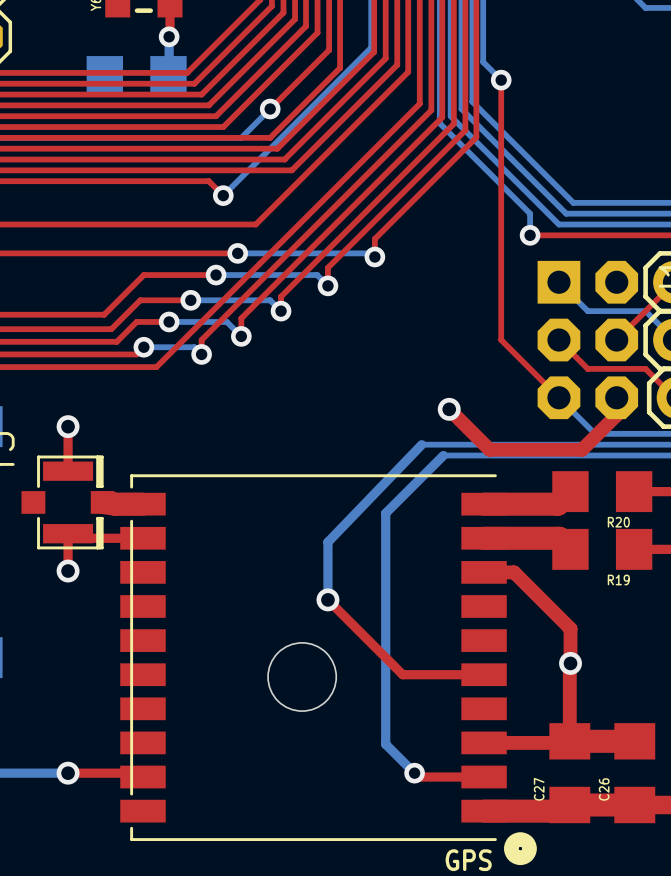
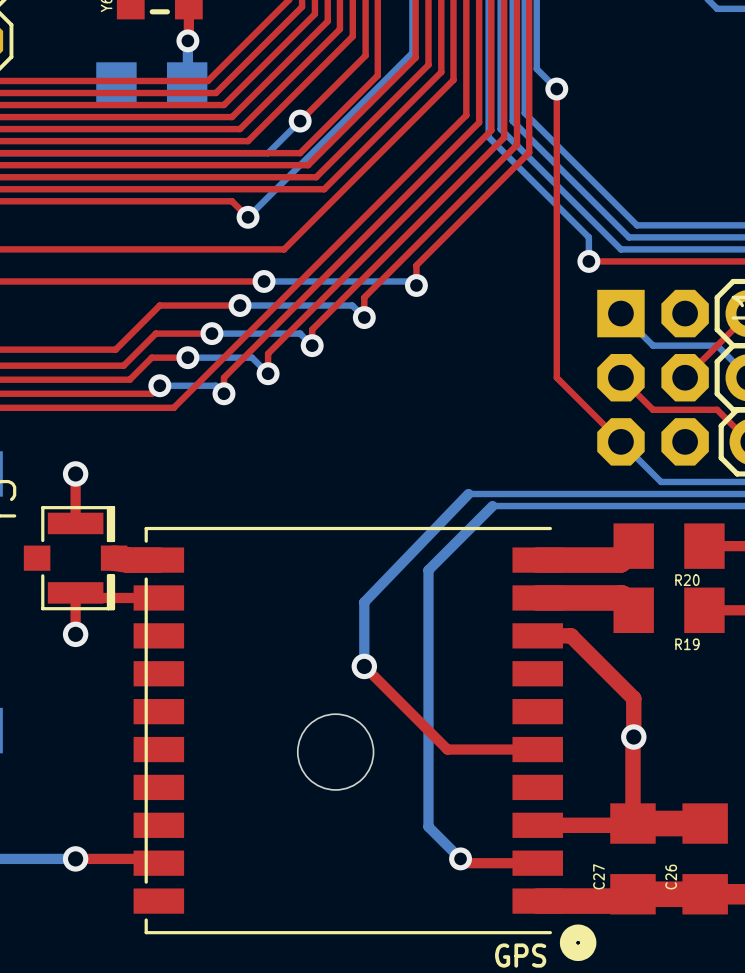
top track: (616, 397) (616, 415) (582, 449) (489, 449) (449, 409) -> none
via: (449, 409) -> none

